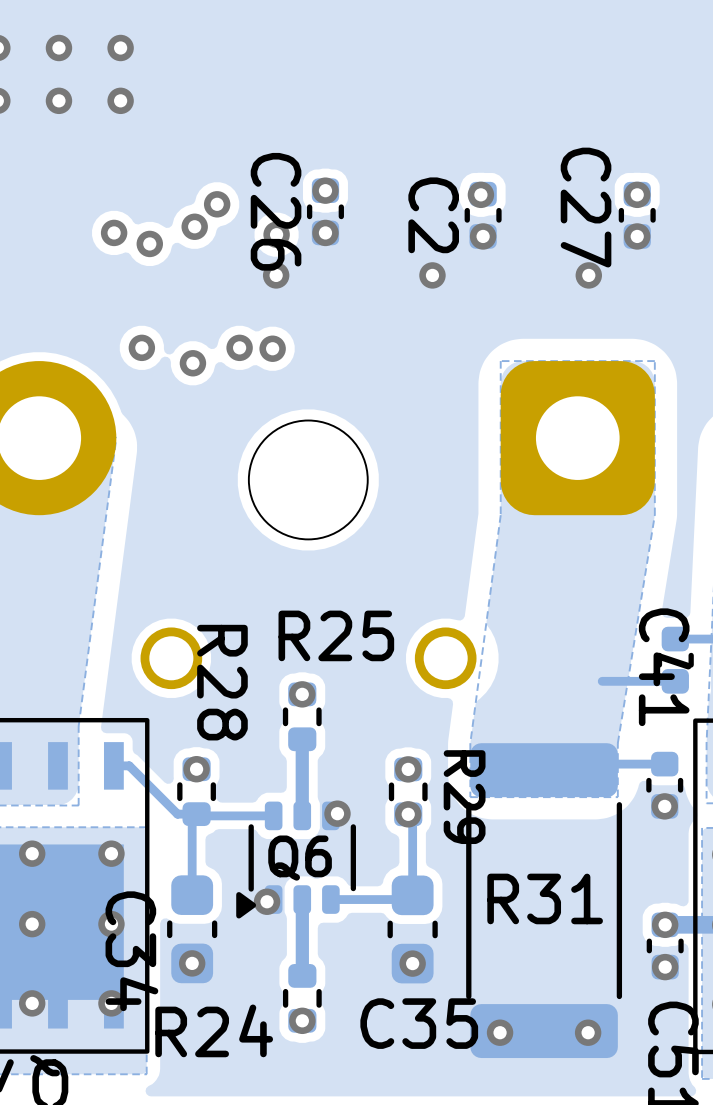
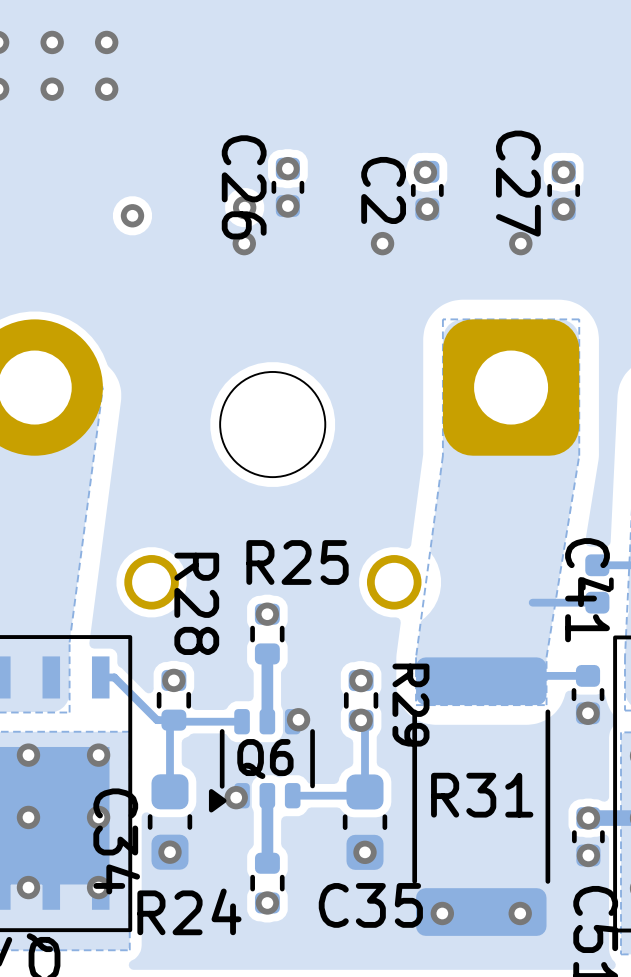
via: (217, 204) -> none
via: (194, 226) -> none
via: (114, 232) -> none
via: (141, 347) -> none
via: (239, 347) -> none
via: (272, 348) -> none
via: (192, 363) -> none

